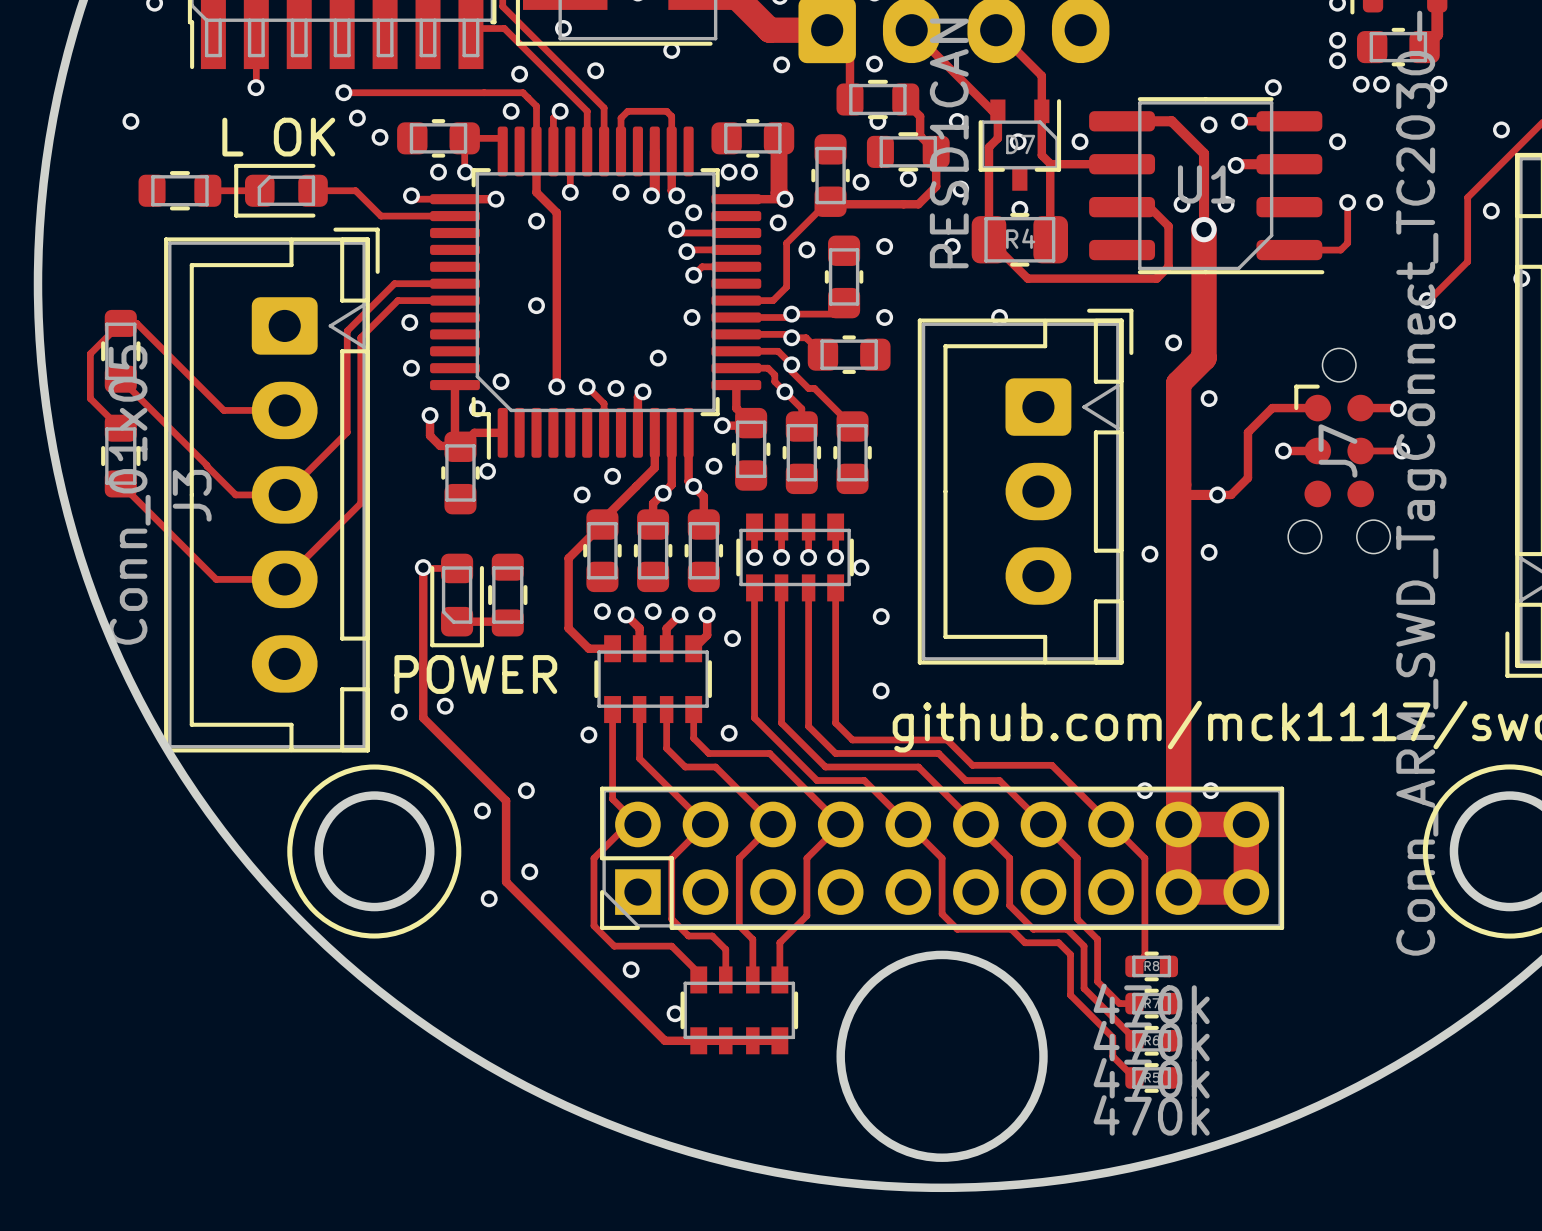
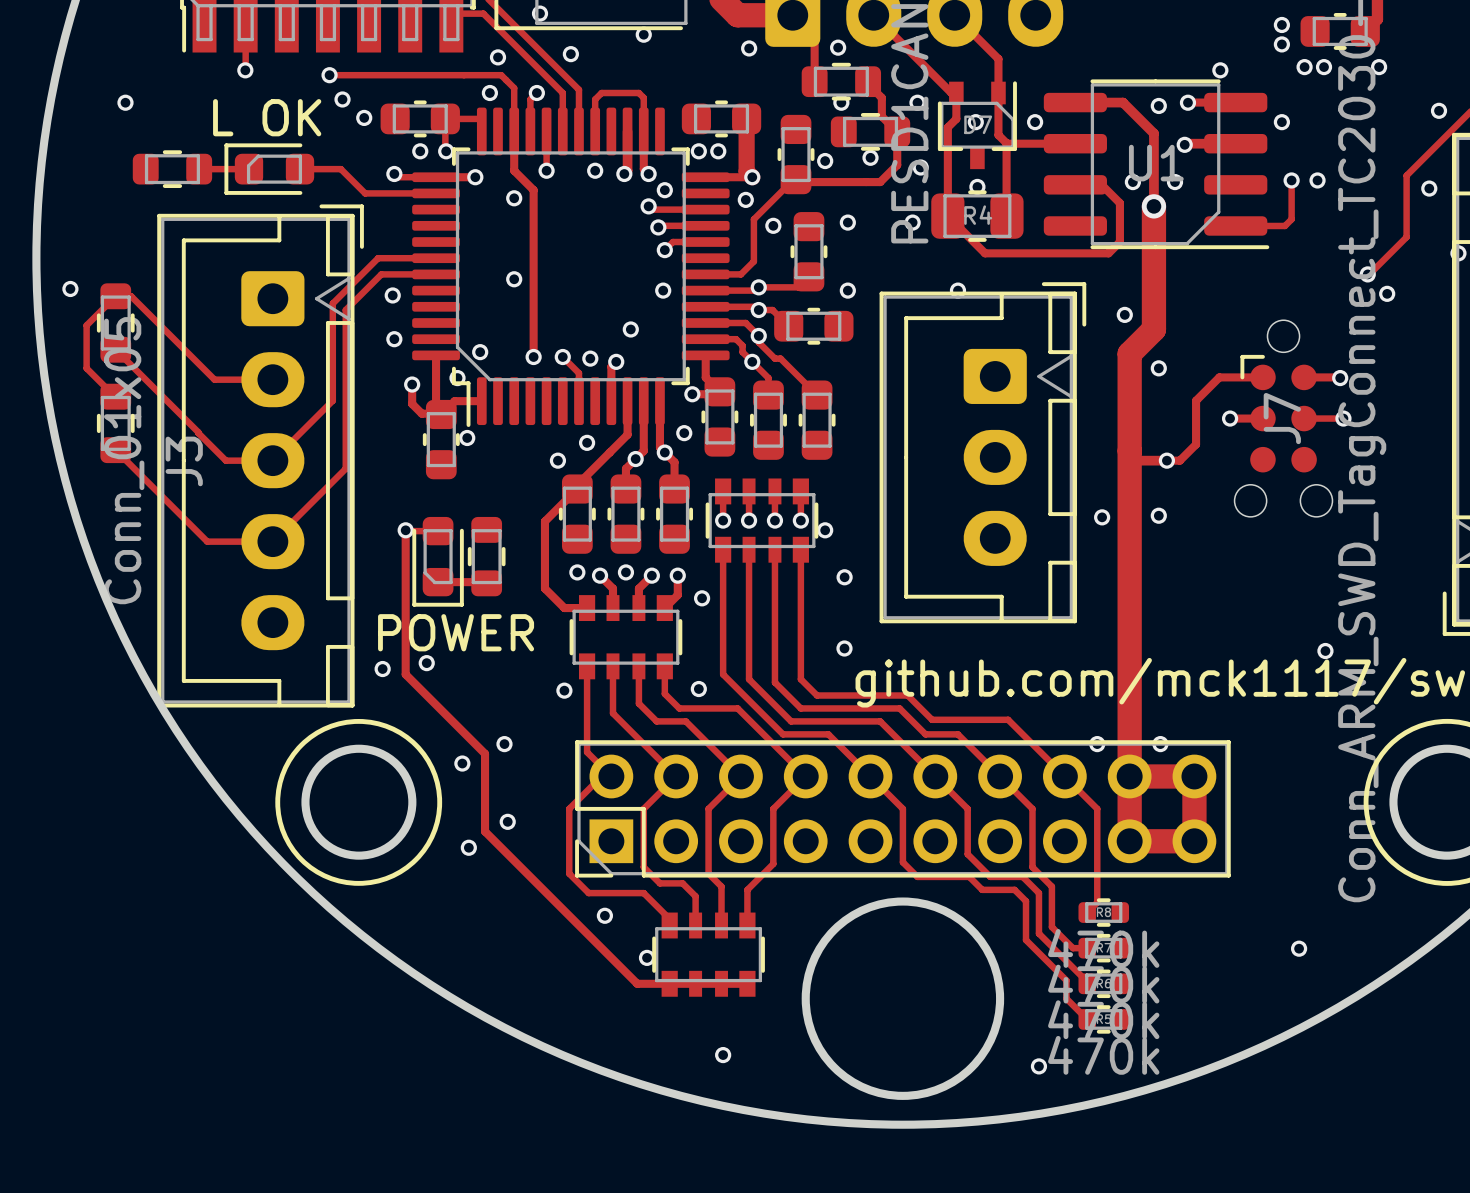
via: none -> (70, 288)
via: none -> (1325, 651)
via: none -> (1299, 948)
via: none -> (723, 1055)
via: none -> (1038, 1066)

